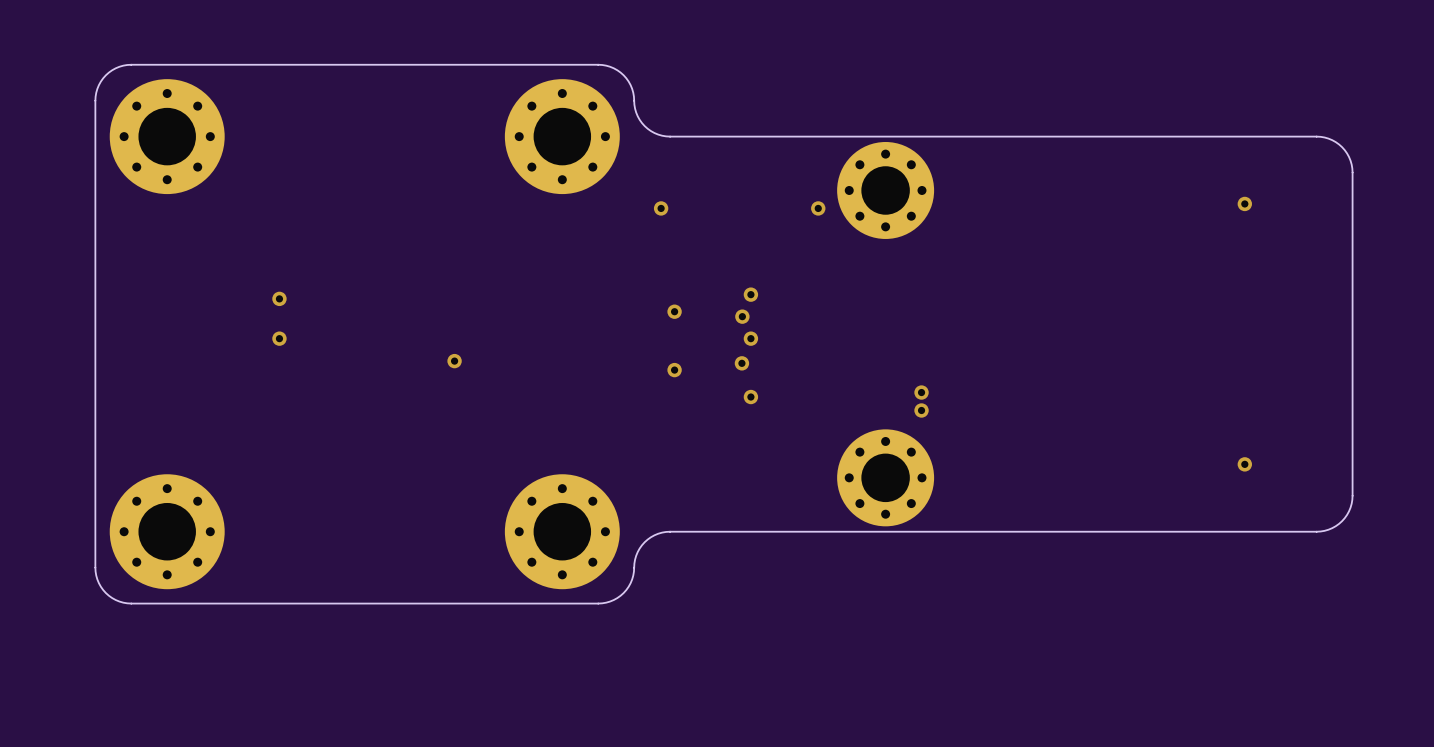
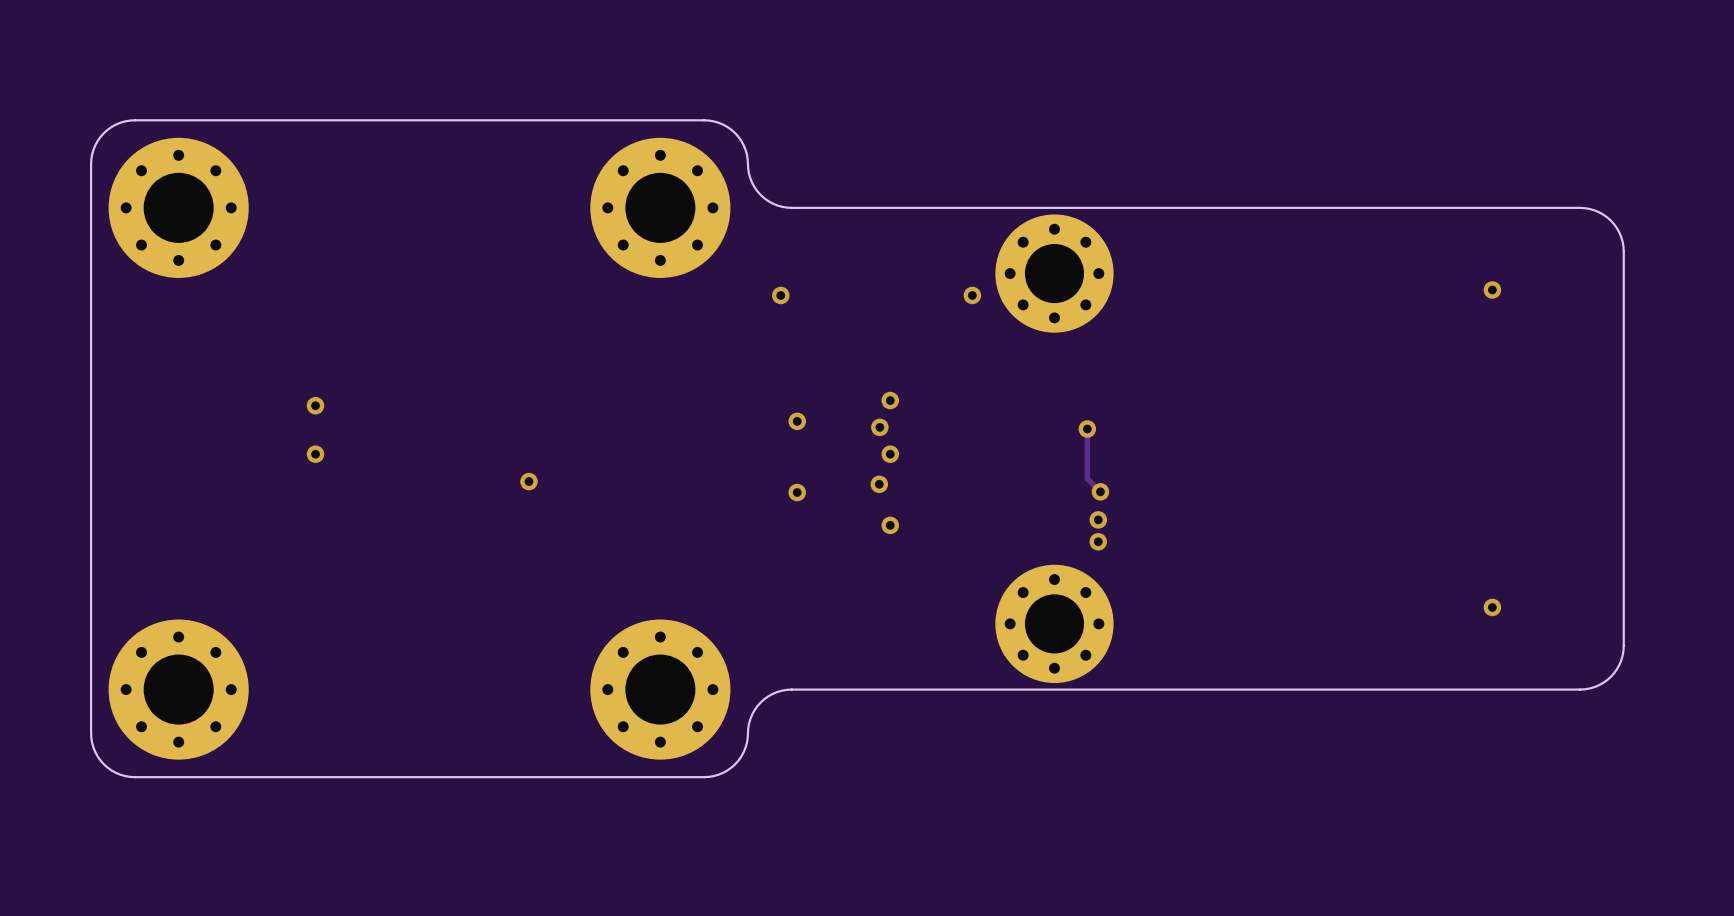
track: none -> (1087, 429) (1087, 478) (1100, 491)
via: none -> (1087, 429)
via: none -> (1100, 491)

